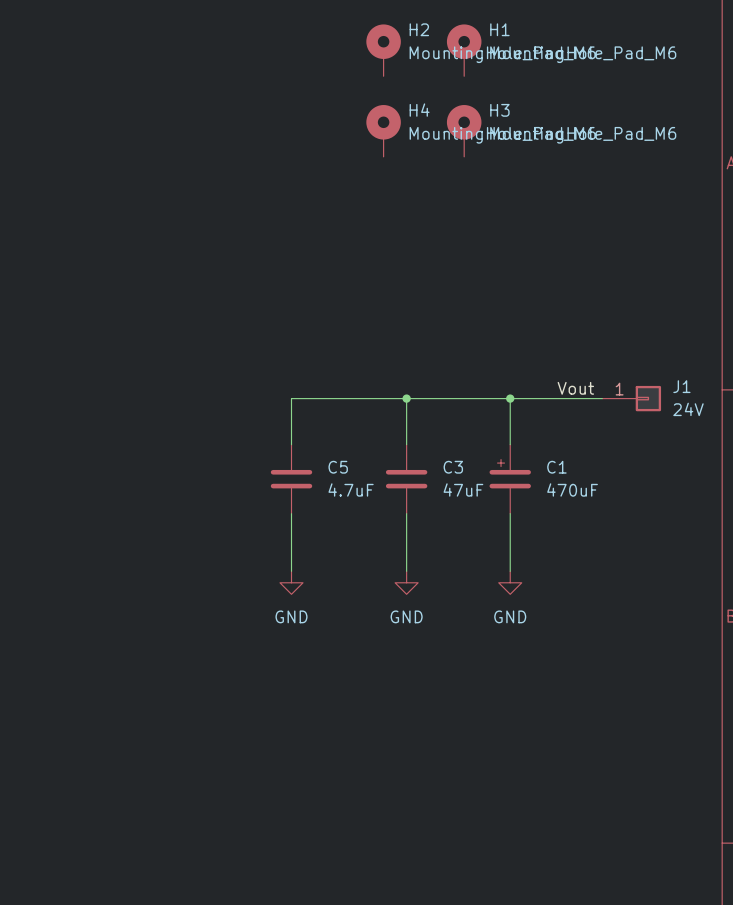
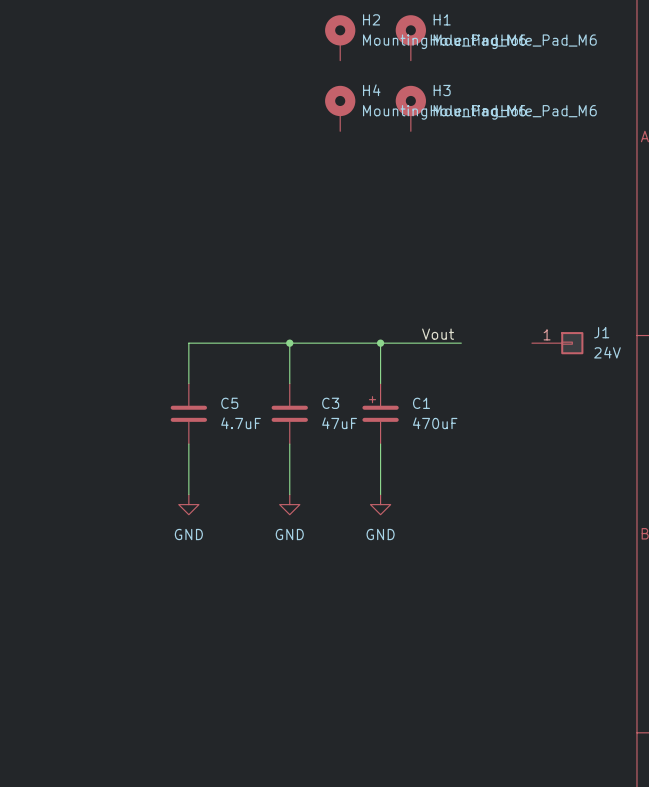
label position: Vout (575, 388) -> Vout (438, 334)
wire: (291, 398) (291, 444) -> (259, 343) (188, 343) (188, 383)
junction: none -> (289, 343)
wire: (406, 398) (406, 444) -> (289, 343) (289, 383)
junction position: (406, 398) -> (380, 343)
wire: (510, 398) (510, 444) -> (380, 343) (380, 383)
junction: (510, 398) -> none
wire: (521, 398) (602, 398) -> none
C5 position: (291, 479) -> (188, 413)
C3 position: (406, 479) -> (289, 413)
C1 position: (510, 479) -> (380, 413)
wire: (291, 513) (291, 571) -> (188, 444) (188, 494)
wire: (406, 513) (406, 571) -> (289, 444) (289, 494)
wire: (510, 513) (510, 571) -> (380, 444) (380, 494)
power symbol: none -> GND (188, 504)
power symbol position: GND (291, 582) -> GND (289, 504)
power symbol position: GND (406, 582) -> GND (380, 504)
power symbol: GND (510, 582) -> none

